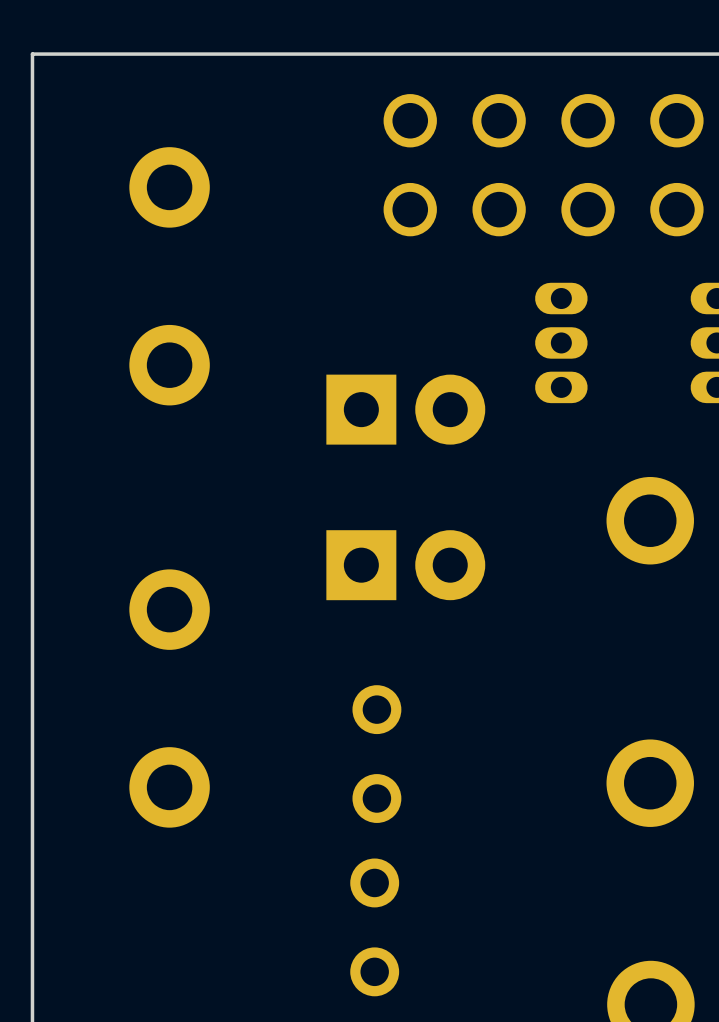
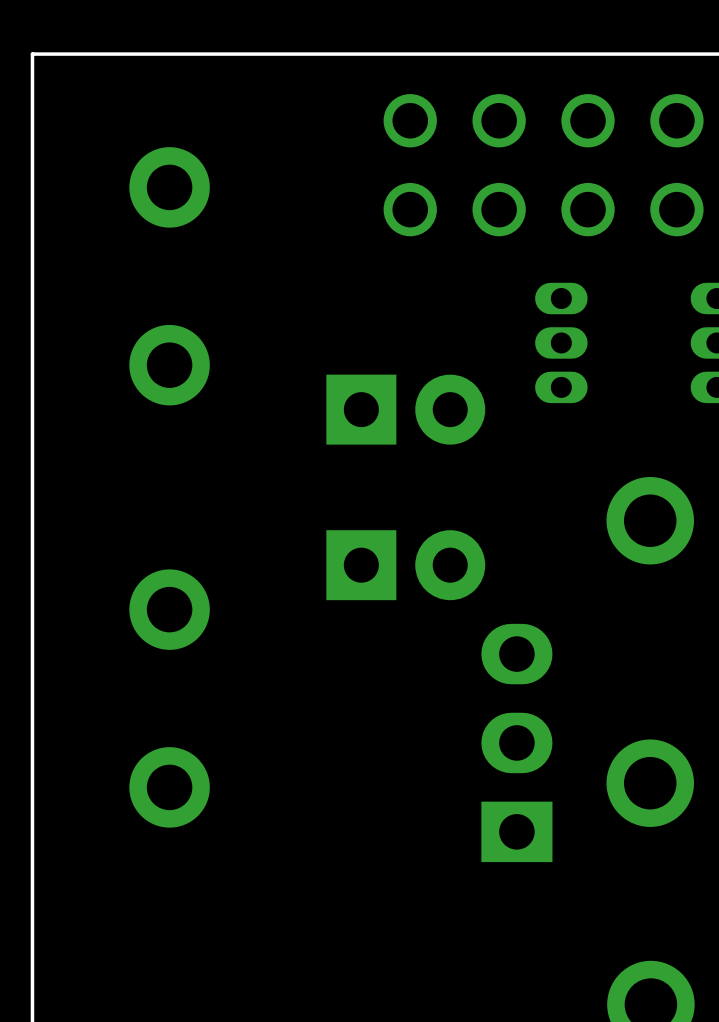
part: none -> (516, 742)
part: (376, 754) -> none
part: (374, 927) -> none

